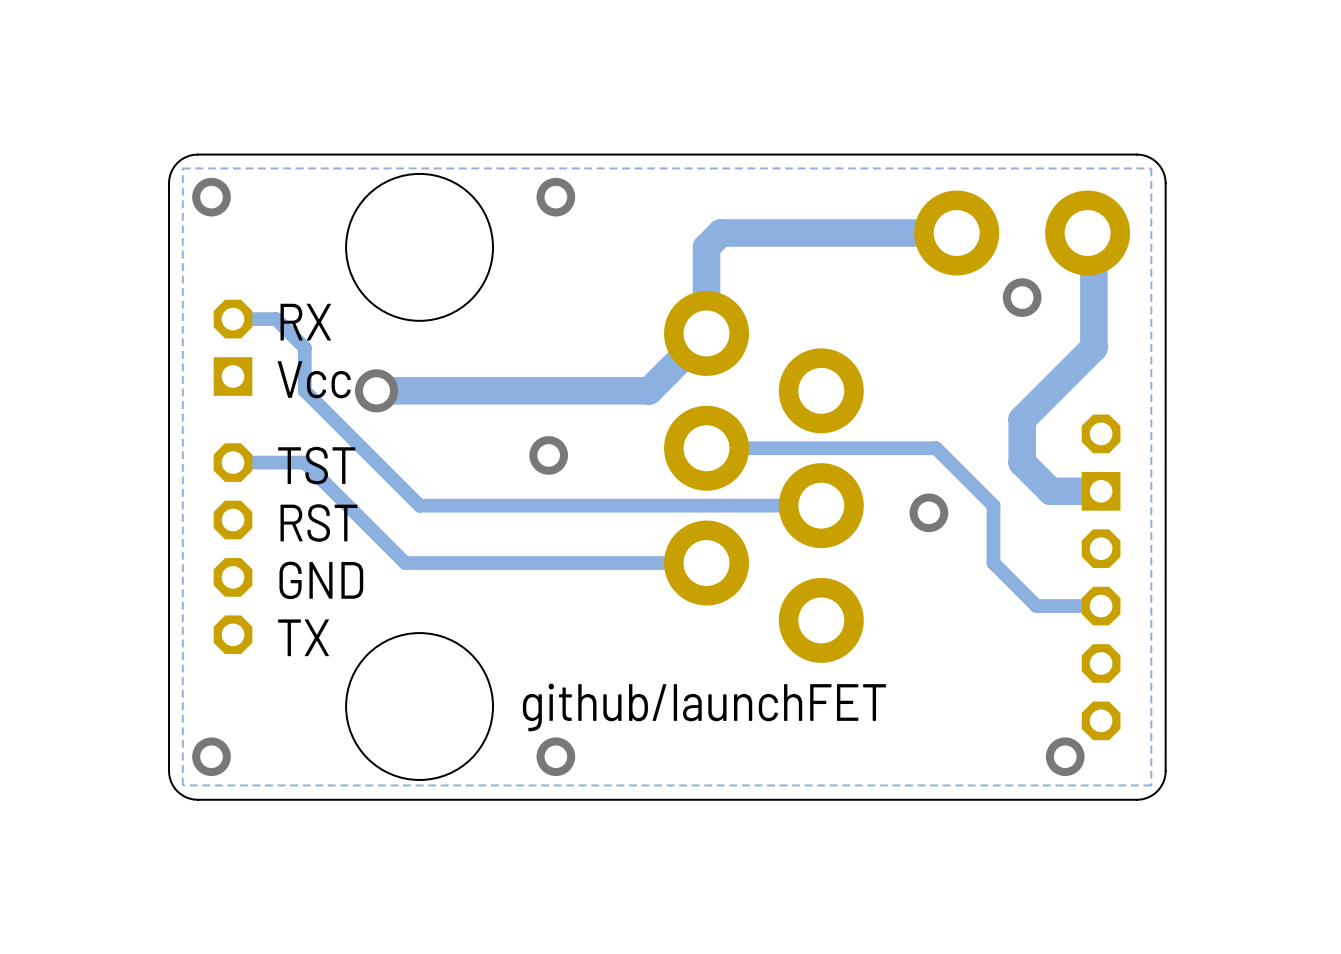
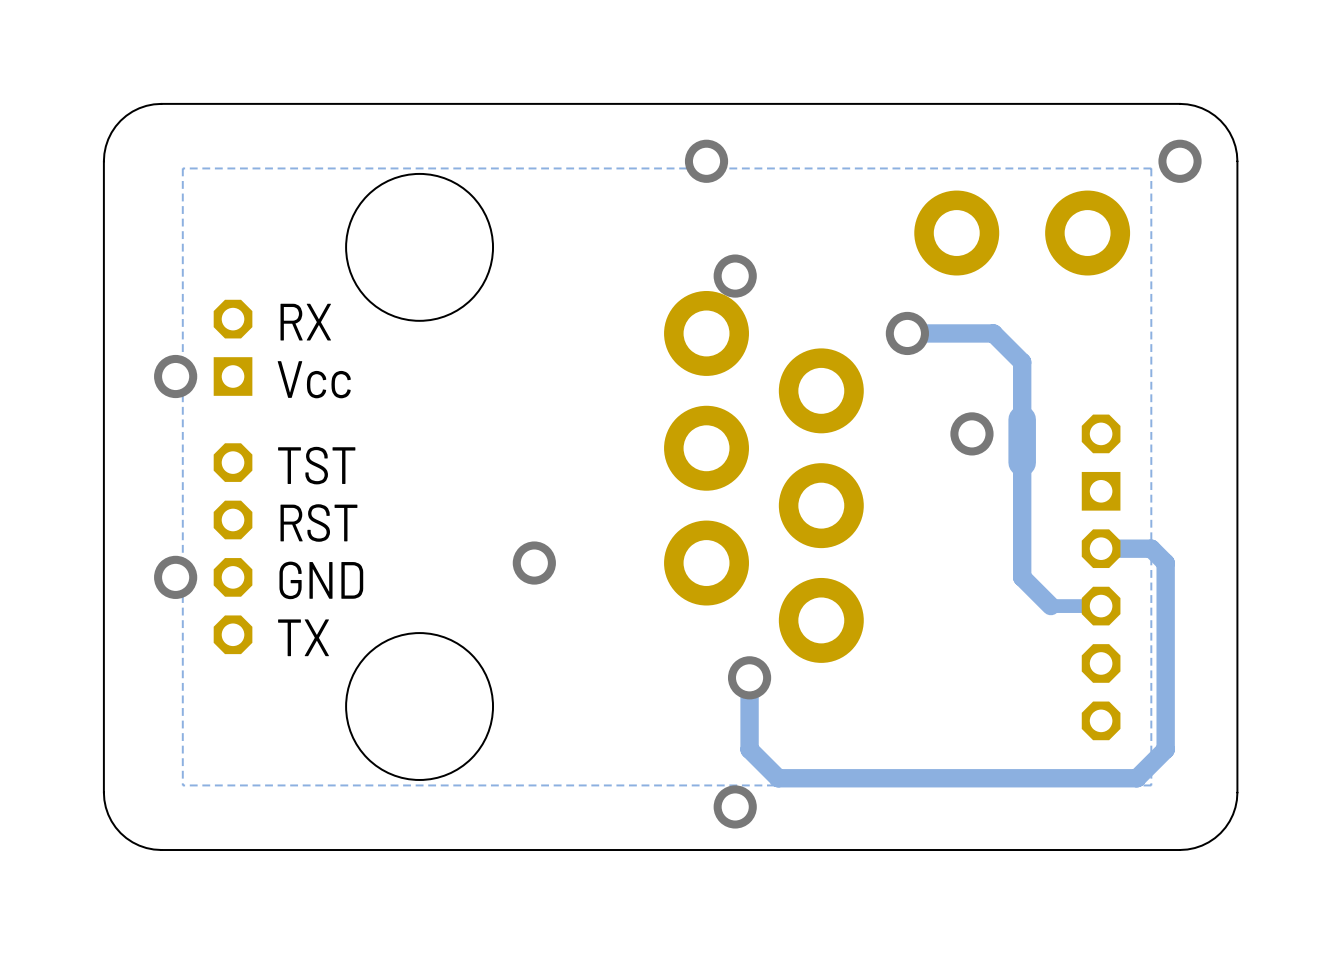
board edge: (1136, 154) (197, 154) (183, 158) (172, 168) (169, 183) (169, 771) (172, 785) (183, 795) (197, 799) (1136, 799) (1151, 795) (1161, 785) (1165, 771) (1165, 183) (1163, 172) (1157, 162) (1147, 156) (1136, 154) -> (1180, 103) (1201, 108) (1220, 120) (1233, 139) (1237, 161) (1237, 792) (1235, 807) (1229, 821) (1214, 838) (1194, 848) (1180, 850) (161, 850) (146, 848) (132, 842) (115, 827) (105, 807) (103, 792) (103, 161) (105, 146) (111, 132) (126, 115) (146, 105) (161, 103) (1180, 103)
via: none -> (706, 161)
via: none -> (1180, 161)
via: (211, 197) -> none
via: (555, 197) -> none
track: (956, 233) (720, 233) (706, 247) (706, 333) (649, 390) (376, 390) -> none
track: (1087, 233) (1093, 239) (1093, 347) (1022, 419) -> (907, 333) (993, 333) (1022, 362) (1022, 419)
via: none -> (735, 276)
via: (1022, 297) -> none
track: (233, 319) (276, 319) (304, 347) (304, 390) (419, 505) (821, 505) -> none
via: none -> (907, 333)
via: none -> (175, 376)
via: (376, 390) -> none
via: none -> (971, 433)
track: (706, 448) (936, 448) (993, 505) (993, 563) (1036, 606) (1050, 606) -> none
via: (548, 455) -> none
track: (233, 462) (304, 462) (405, 563) (706, 563) -> none
track: (1022, 462) (1050, 491) (1101, 491) -> (1022, 462) (1022, 577) (1050, 606)
via: (928, 512) -> none
track: none -> (1101, 548) (1151, 548) (1165, 563) (1165, 749) (1136, 778) (778, 778) (749, 749) (749, 677)
via: none -> (534, 563)
via: none -> (175, 577)
via: none -> (749, 677)
text: github/launchFET (704, 707) -> none
via: (211, 756) -> none
via: (555, 756) -> none
via: (1065, 756) -> none
via: none -> (735, 806)

